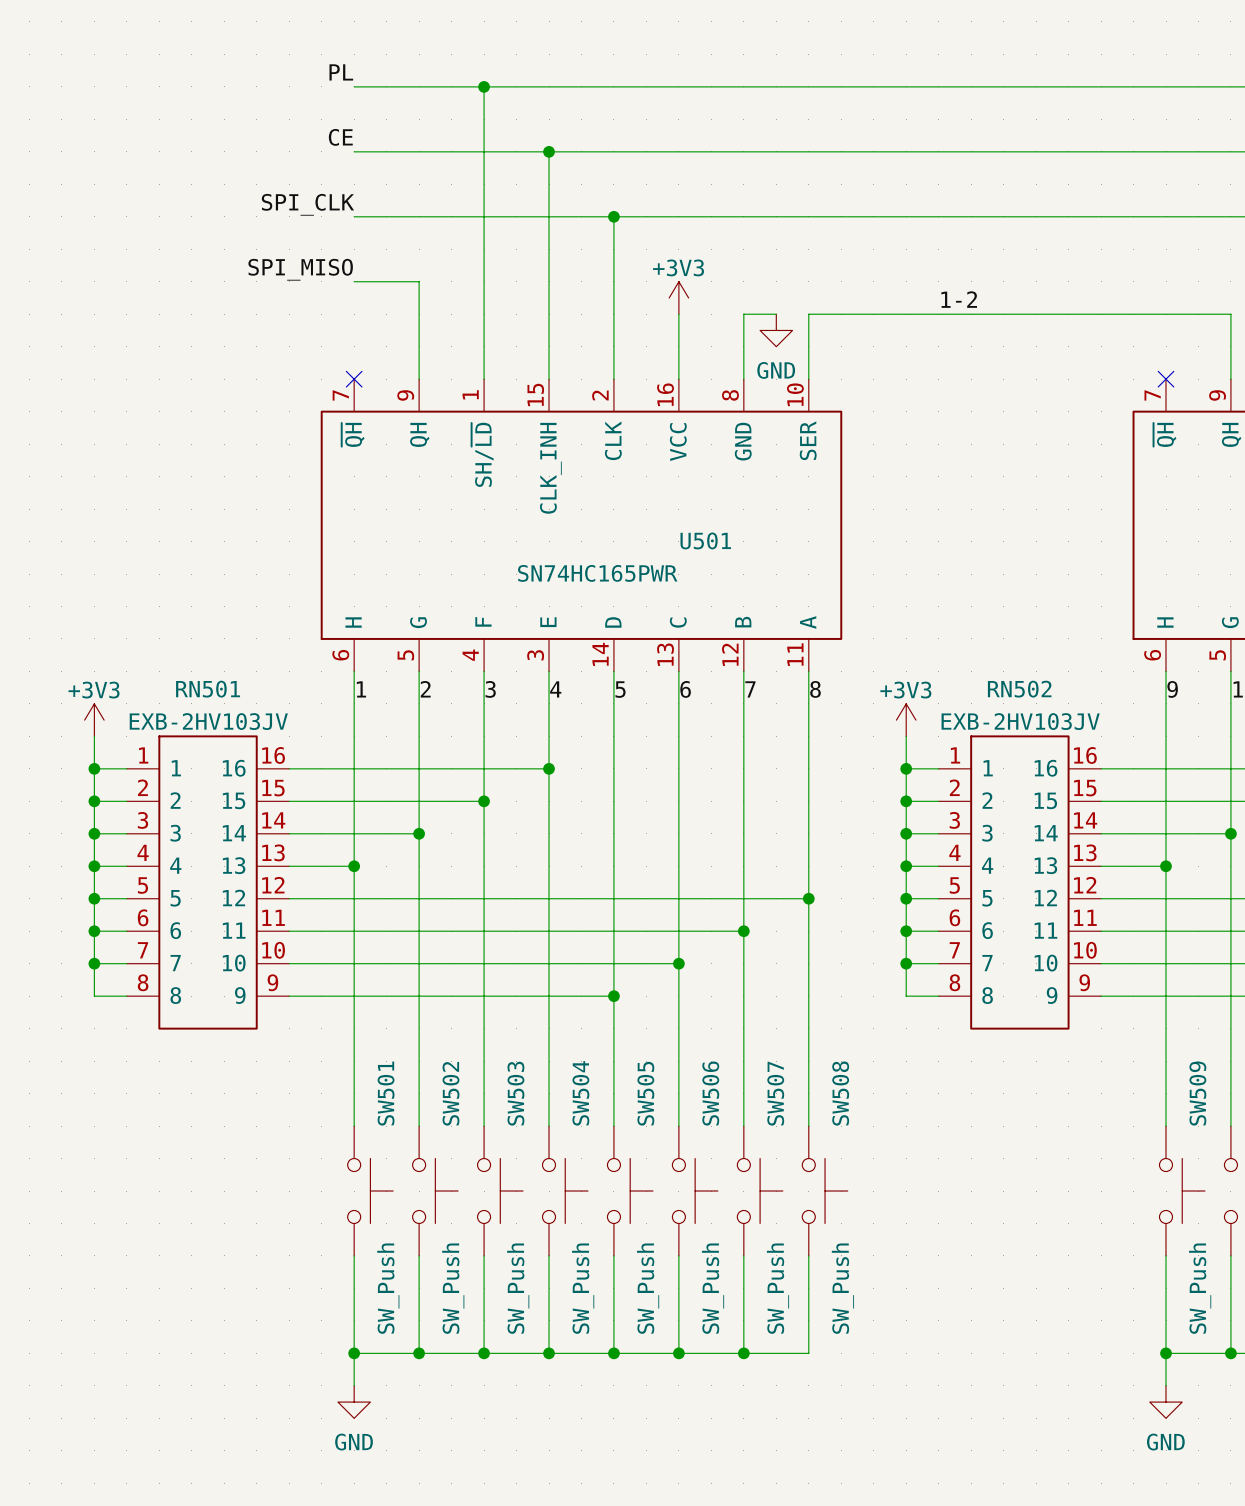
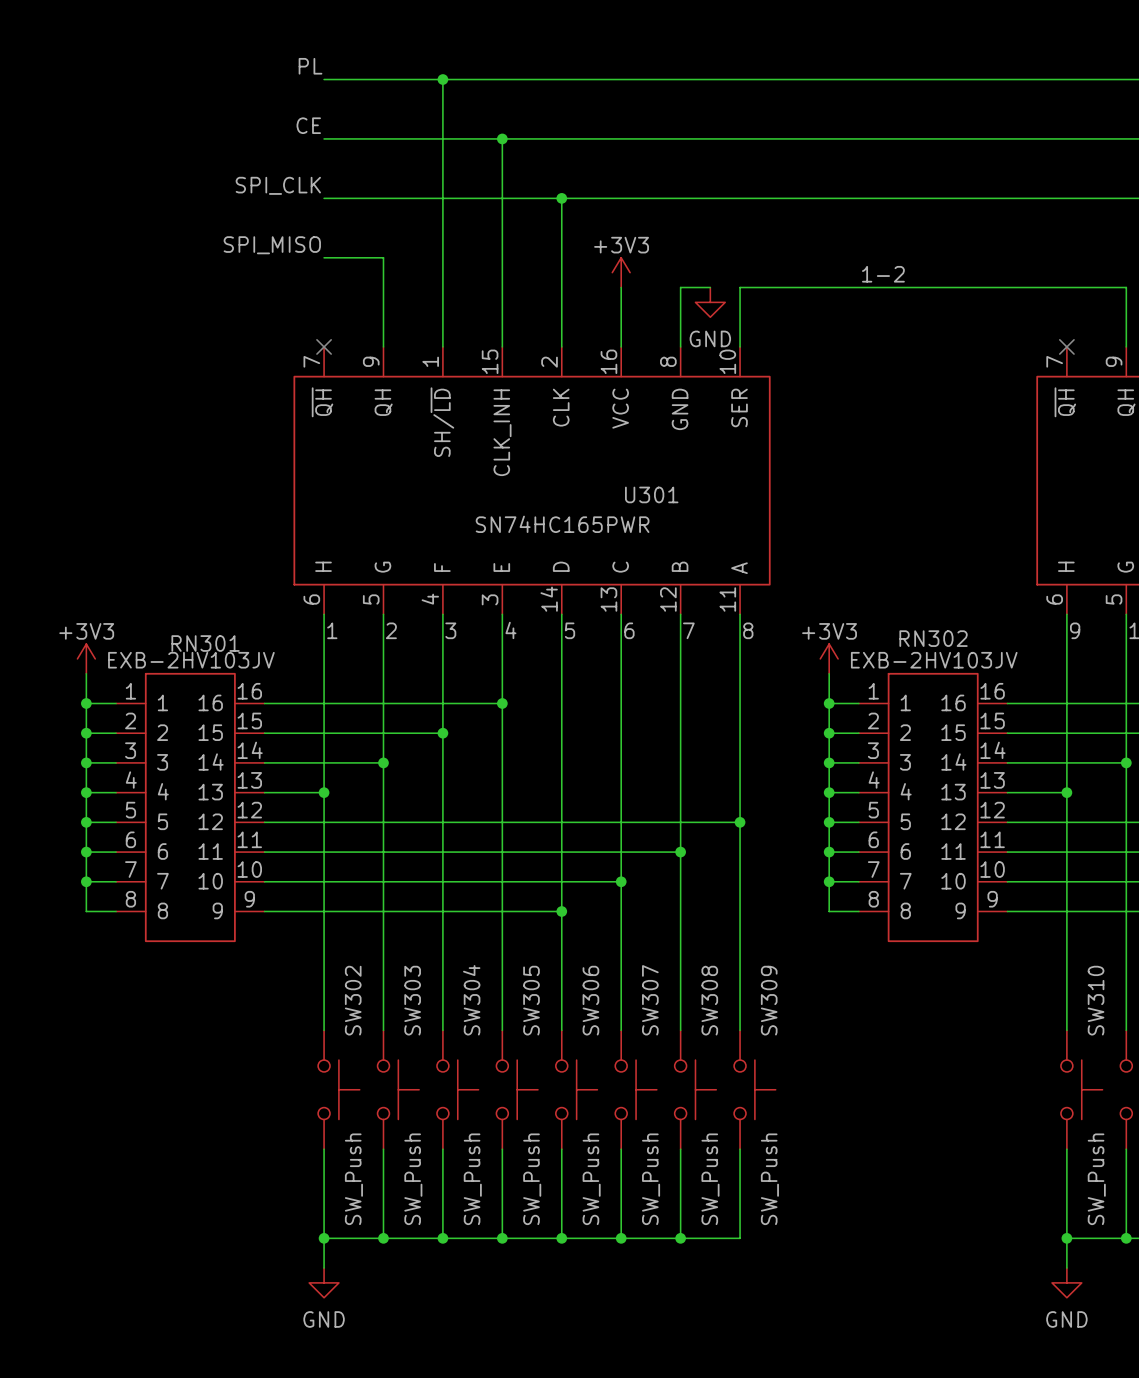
U501 name: U501 (705, 540) -> U301 (651, 494)
RN501 name: RN501 (208, 689) -> RN301 (205, 643)
RN502 name: RN502 (1019, 689) -> RN302 (933, 638)
SW501 name: SW501 (386, 1093) -> SW302 (353, 1000)
SW502 name: SW502 (450, 1093) -> SW303 (412, 1000)
SW503 name: SW503 (515, 1093) -> SW304 (471, 1000)
SW504 name: SW504 (580, 1093) -> SW305 (531, 1000)
SW505 name: SW505 (645, 1093) -> SW306 (590, 1000)
SW506 name: SW506 (710, 1093) -> SW307 (650, 1000)
SW507 name: SW507 (775, 1093) -> SW308 (709, 1000)
SW508 name: SW508 (840, 1093) -> SW309 (769, 1000)
SW509 name: SW509 (1197, 1093) -> SW310 (1096, 1000)

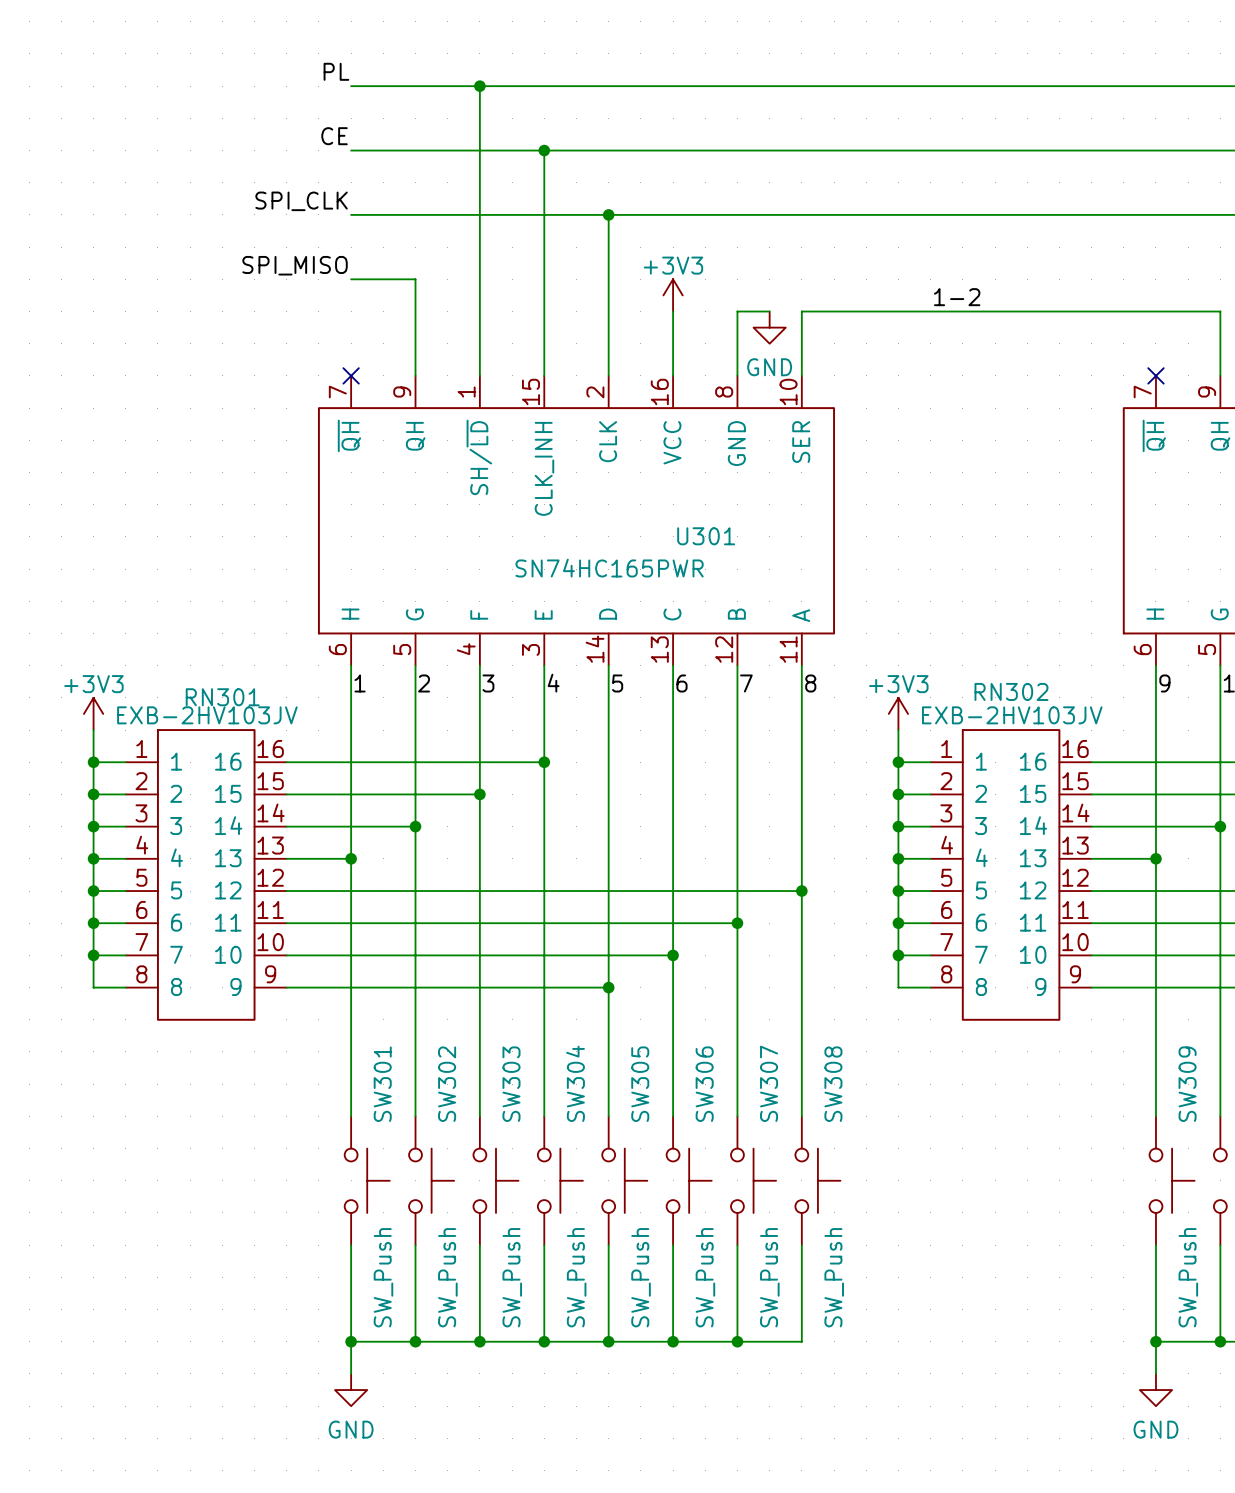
SW302 name: SW302 (353, 1000) -> SW301 (382, 1084)
SW303 name: SW303 (412, 1000) -> SW302 (447, 1084)
SW304 name: SW304 (471, 1000) -> SW303 (511, 1084)
SW305 name: SW305 (531, 1000) -> SW304 (575, 1083)
SW306 name: SW306 (590, 1000) -> SW305 (640, 1084)
SW307 name: SW307 (650, 1000) -> SW306 (704, 1084)
SW308 name: SW308 (709, 1000) -> SW307 (769, 1083)
SW309 name: SW309 (769, 1000) -> SW308 (833, 1084)
SW310 name: SW310 (1096, 1000) -> SW309 (1187, 1084)

